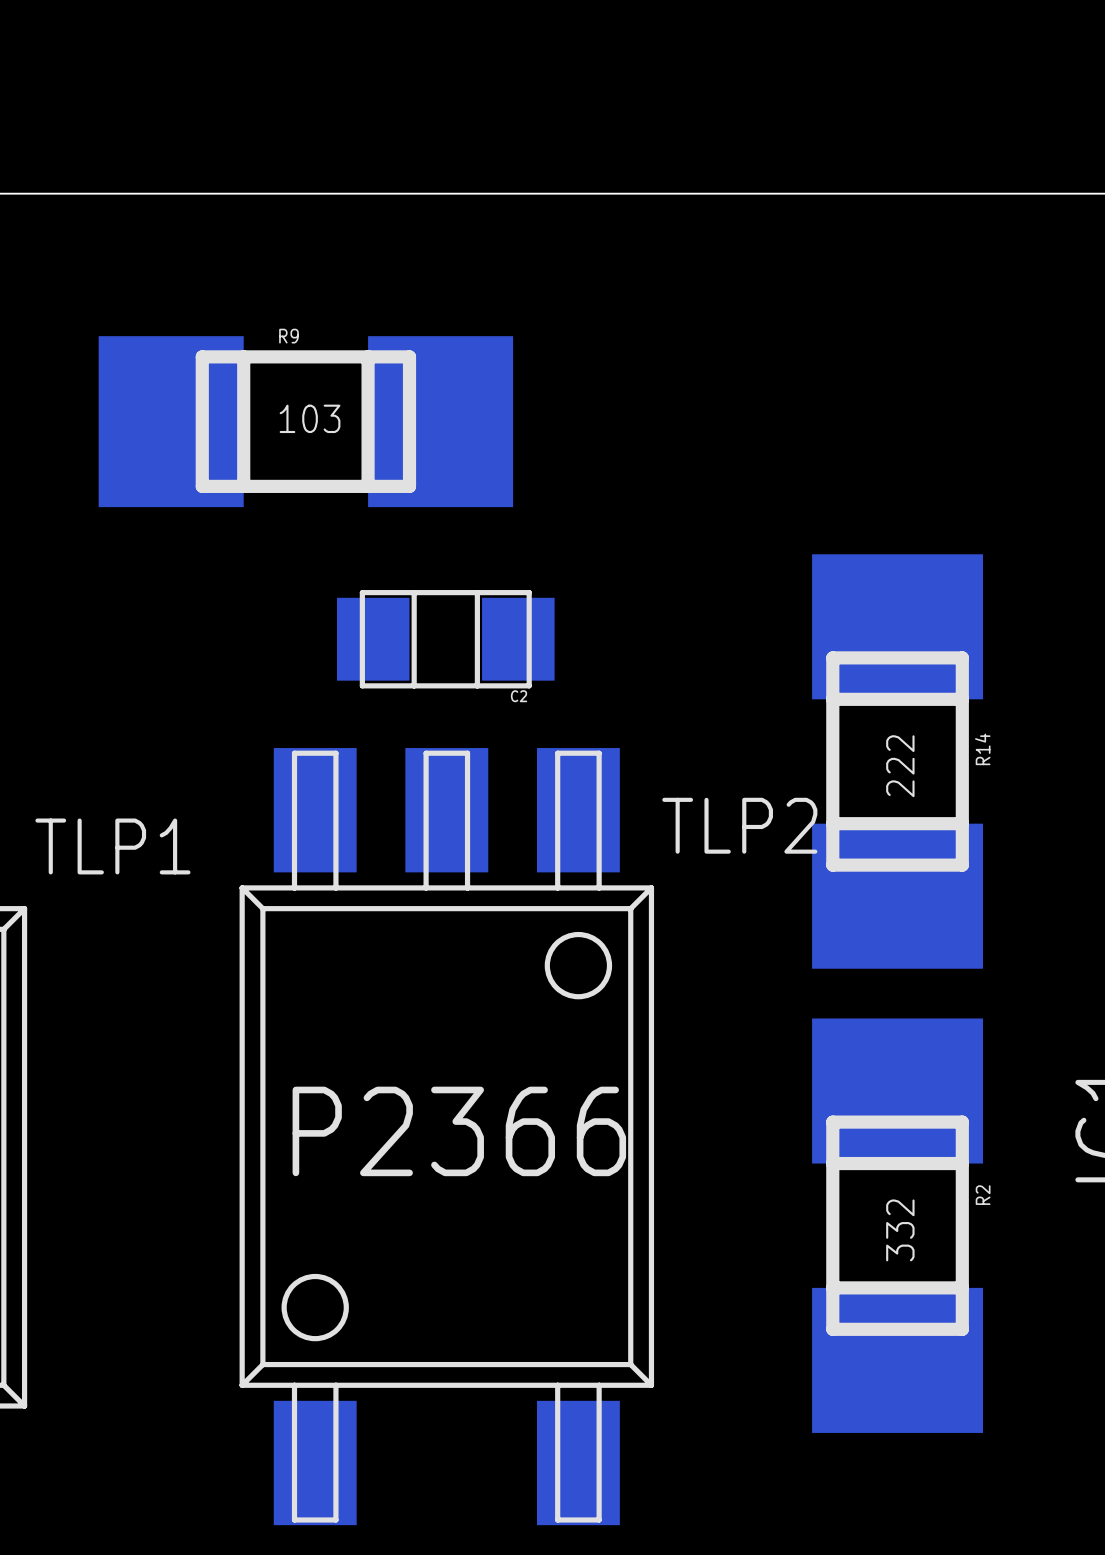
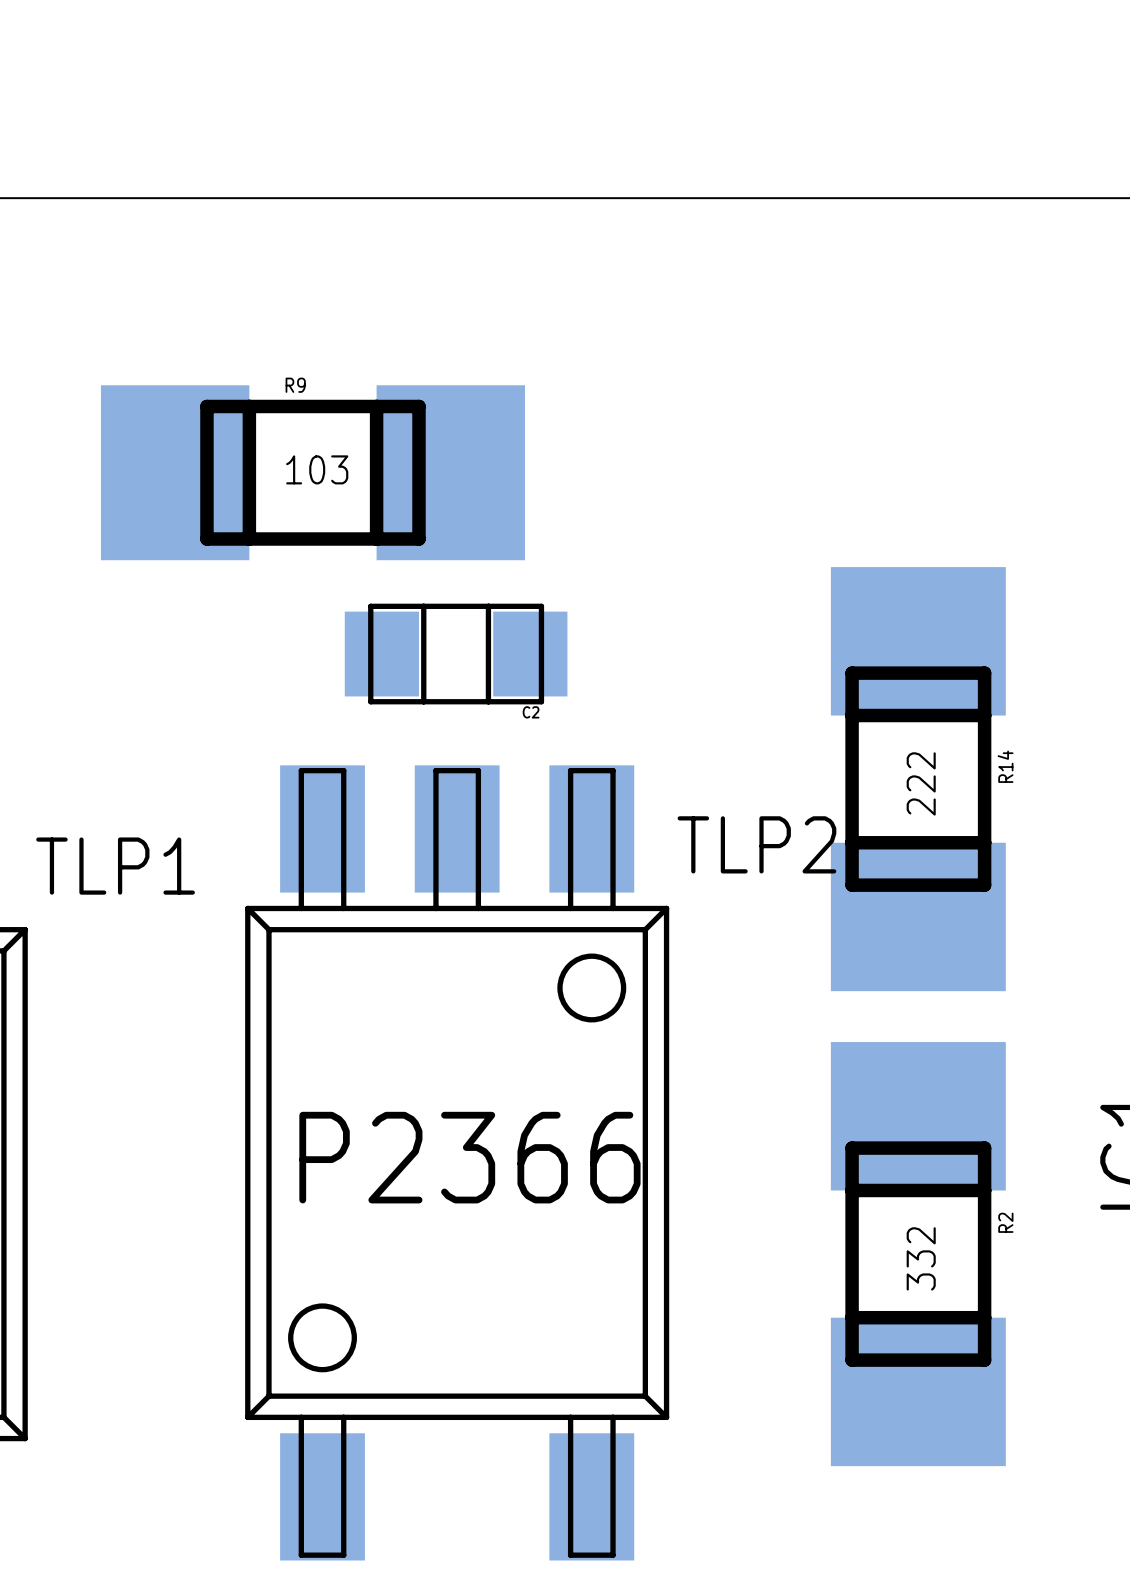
R9 position: (305, 421) -> (312, 472)

